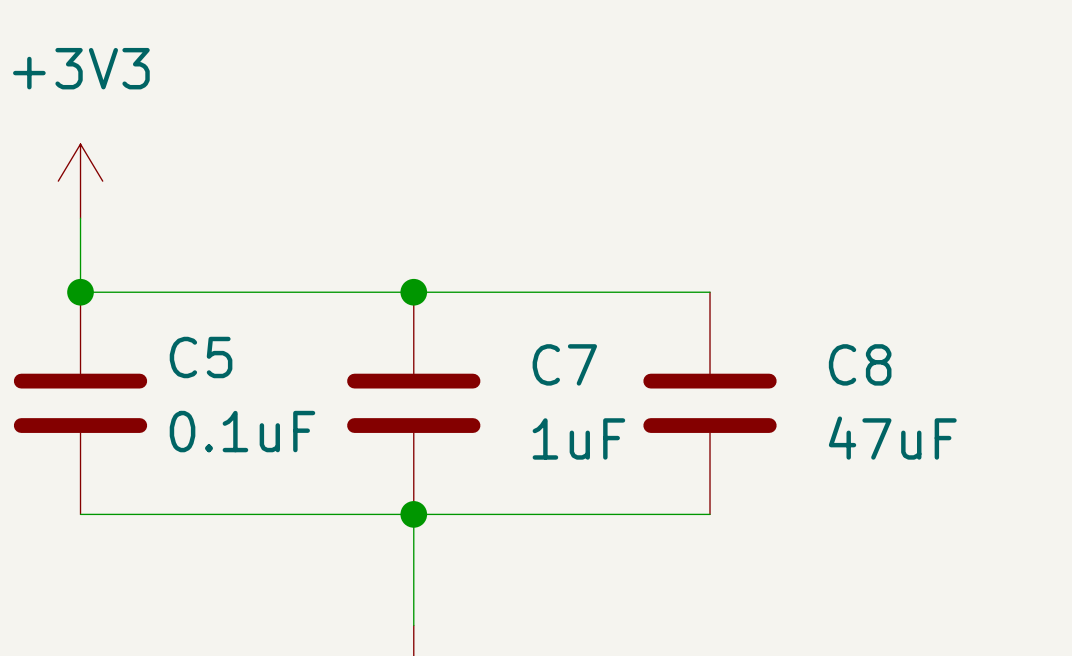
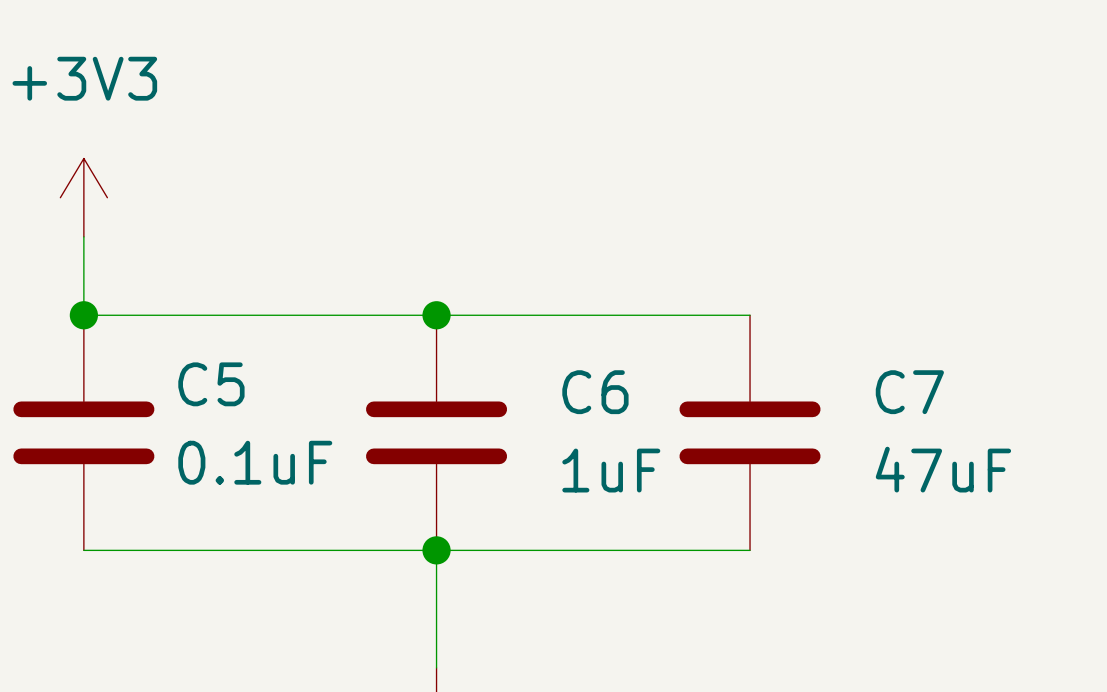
C7 name: C7 (564, 364) -> C6 (595, 392)
C8 name: C8 (860, 364) -> C7 (909, 392)

